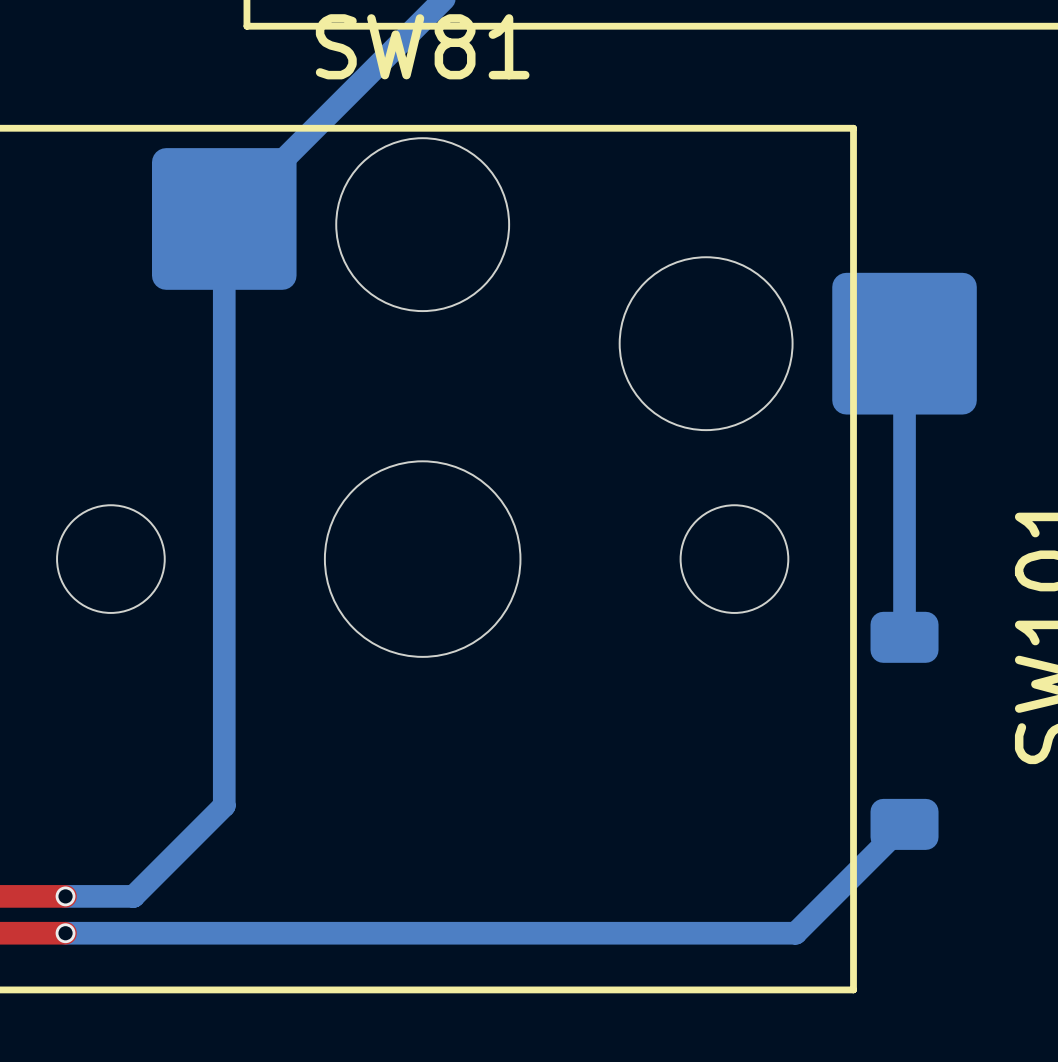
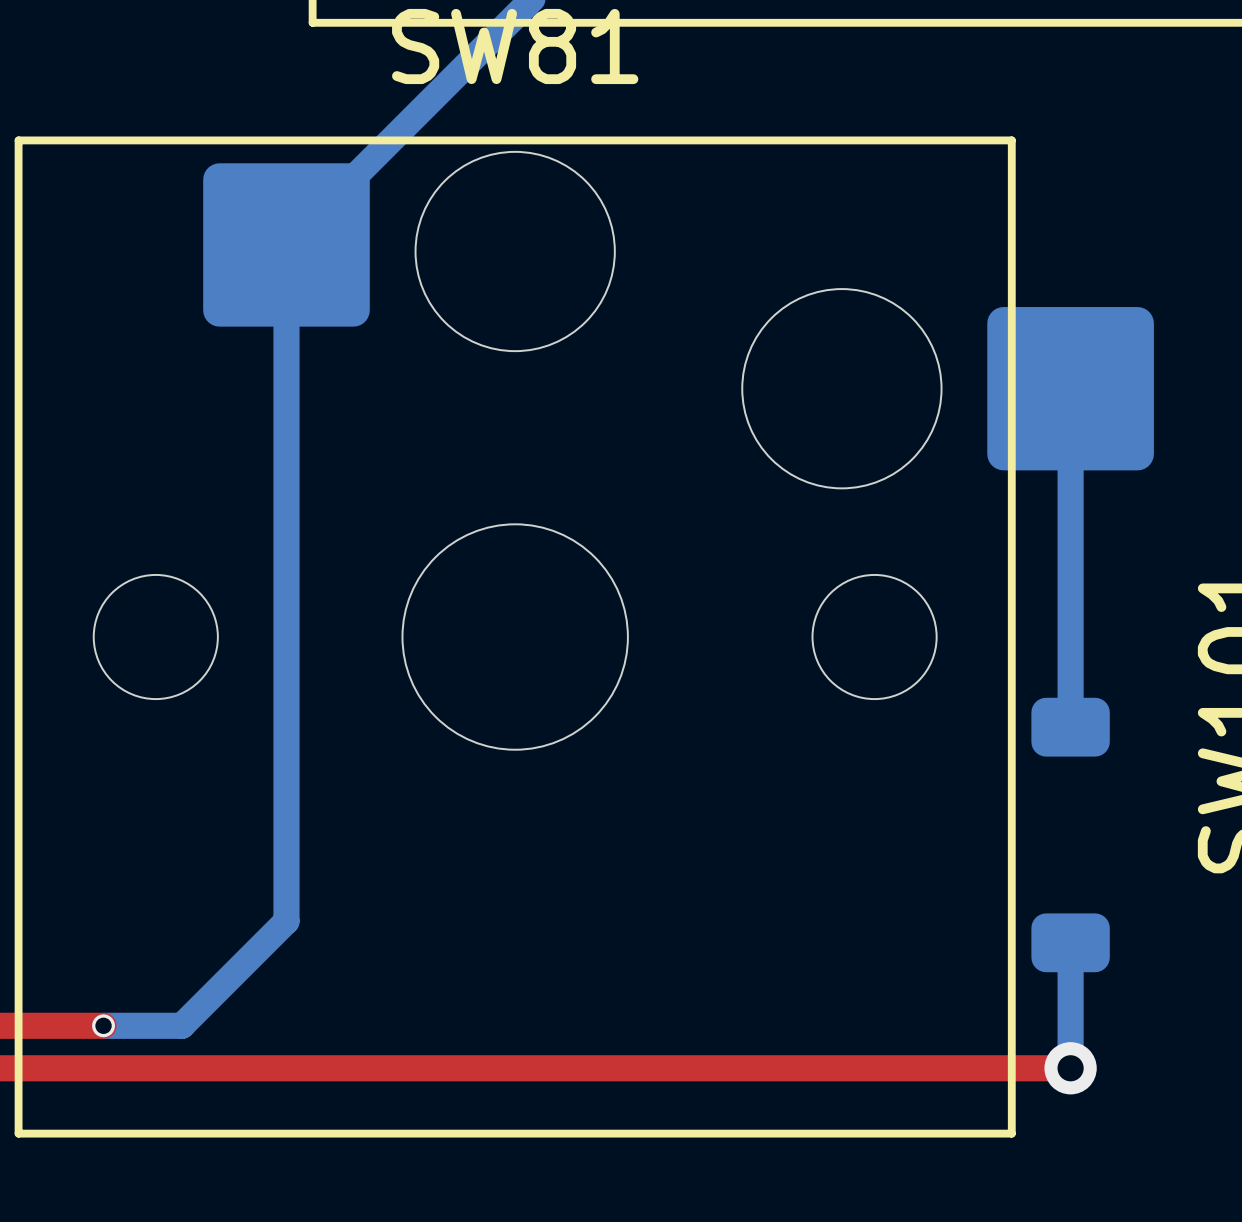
bottom track: (904, 824) (795, 933) (65, 933) -> (1070, 942) (1070, 1068)
top track: none -> (103, 1068) (1070, 1068)
via: (65, 933) -> none
via: none -> (1070, 1068)

